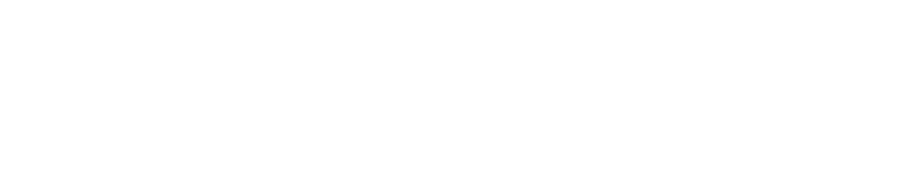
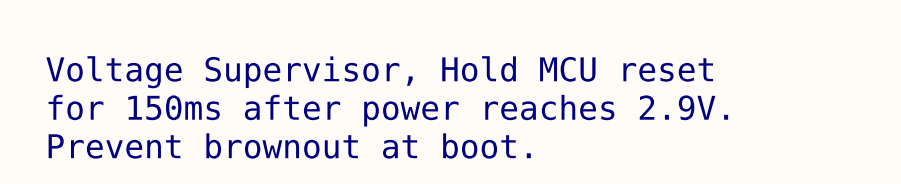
text: none -> Voltage Supervisor, Hold MCU reset (379, 72)
text: none -> for 150ms after power reaches 2.9V. (388, 110)
text: none -> Prevent brownout at boot. (289, 145)

